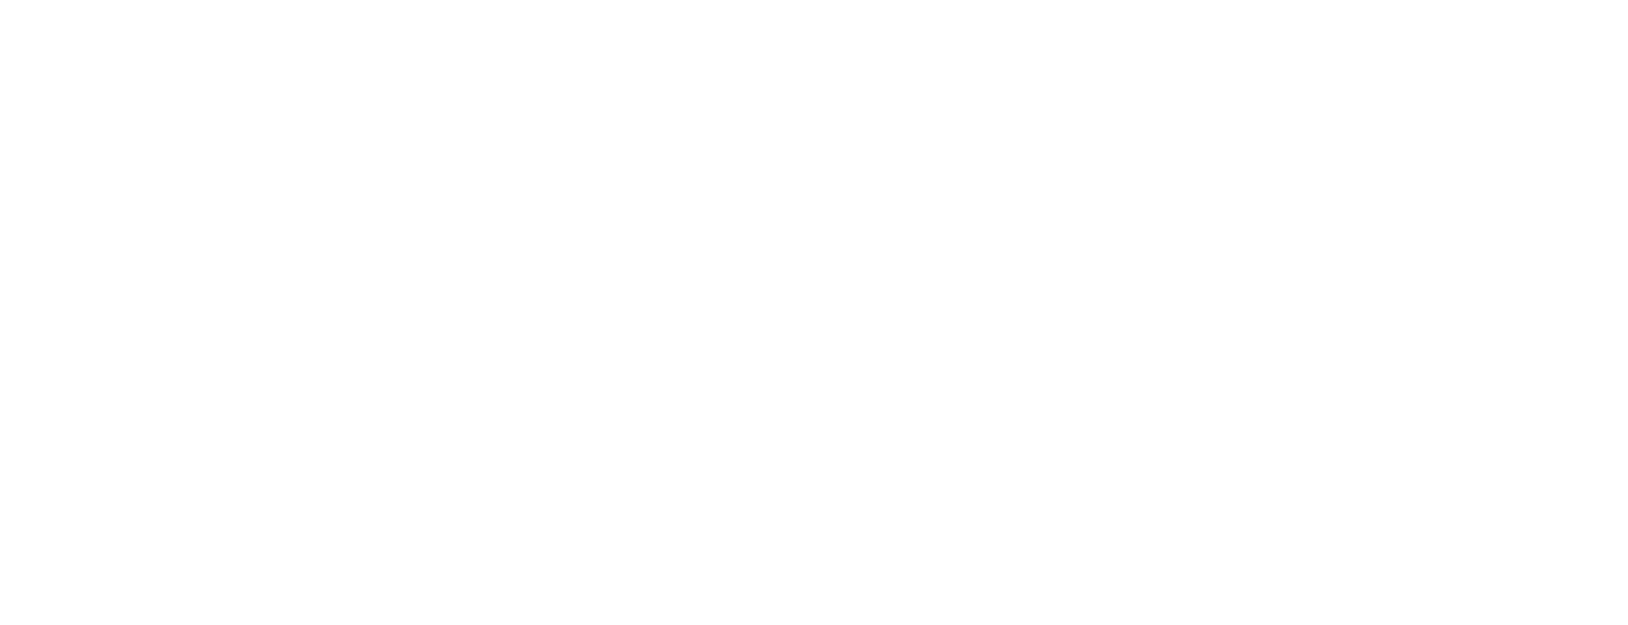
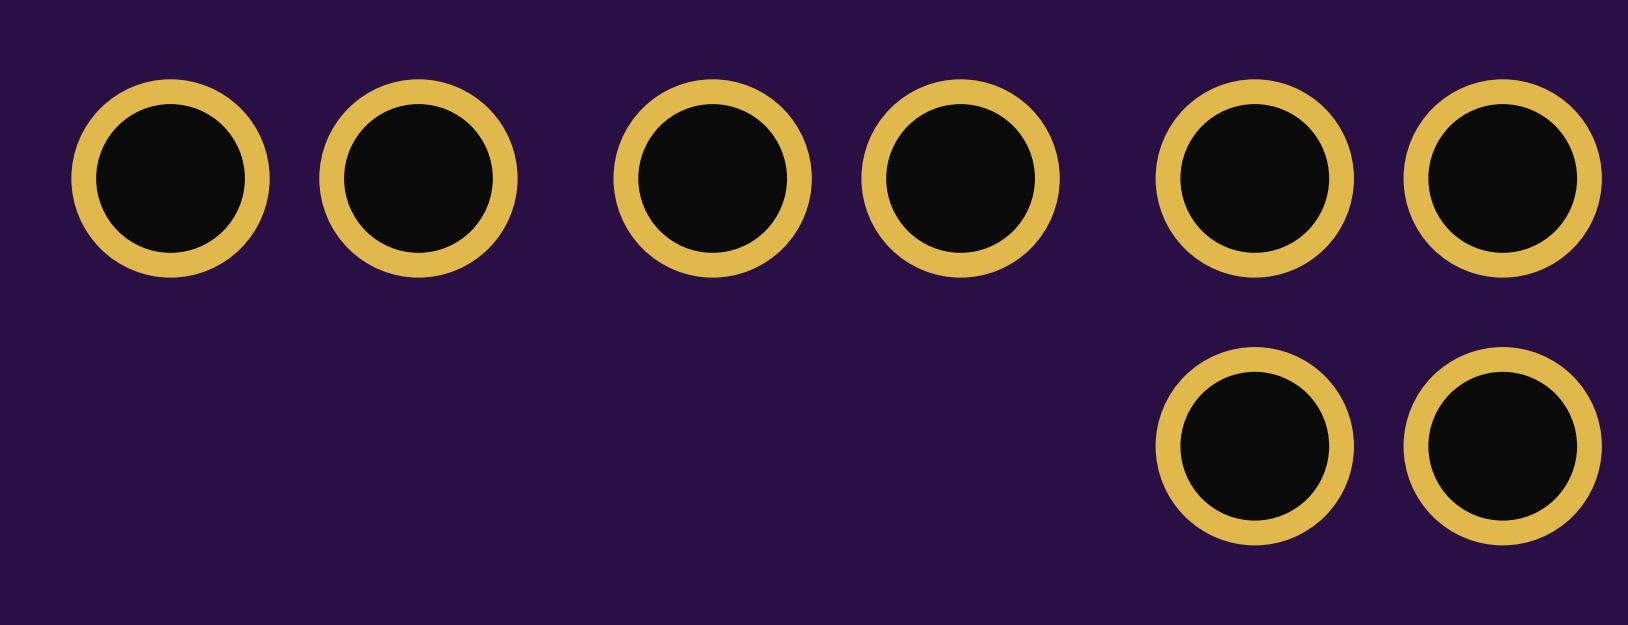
part: none -> (294, 178)
part: none -> (836, 178)
part: none -> (1378, 178)
part: none -> (1378, 446)

